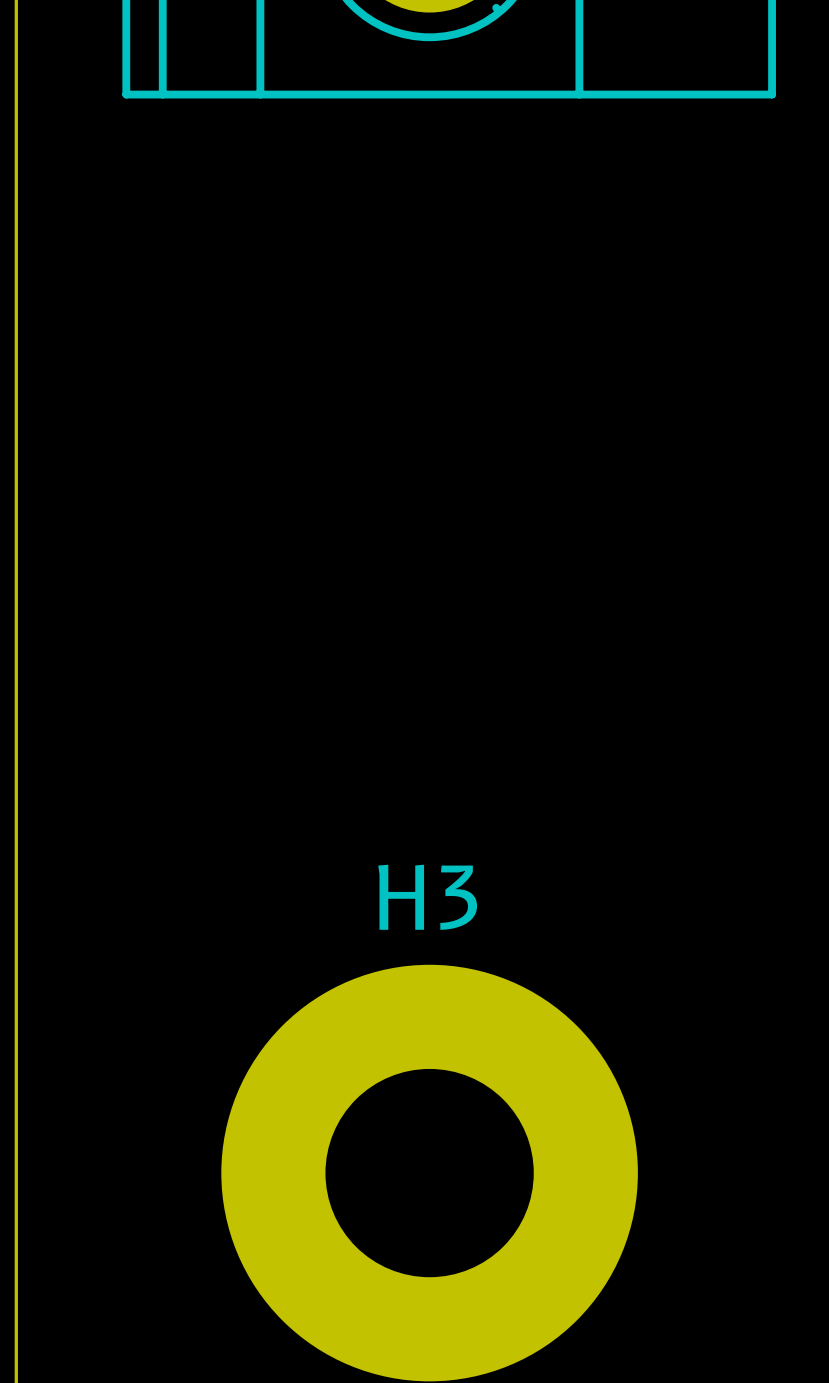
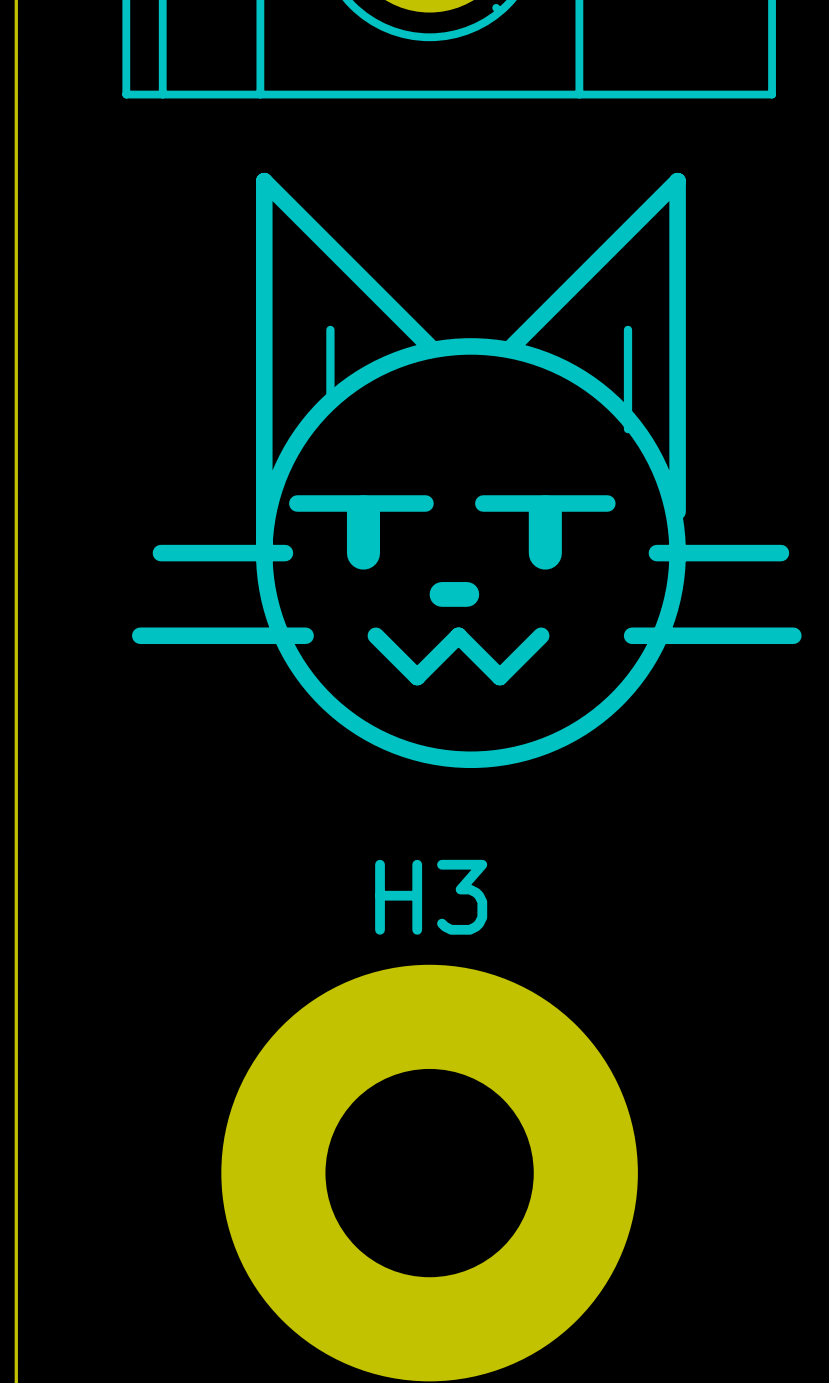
line: none -> (330, 329) (330, 396)
line: none -> (628, 329) (628, 429)
drawing: none -> [256, 338, 686, 769]
line: none -> (429, 346) (264, 181) (264, 553)
line: none -> (512, 346) (677, 181) (677, 511)
line: none -> (297, 503) (425, 503)
line: none -> (483, 503) (607, 503)
line: none -> (363, 511) (363, 553)
line: none -> (545, 511) (545, 553)
line: none -> (160, 553) (284, 553)
line: none -> (656, 553) (780, 553)
line: none -> (442, 594) (466, 594)
line: none -> (140, 635) (305, 635)
line: none -> (375, 635) (417, 677) (458, 635) (499, 677) (541, 635)
line: none -> (632, 635) (793, 635)

